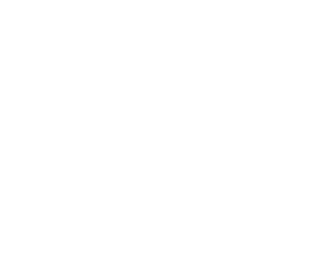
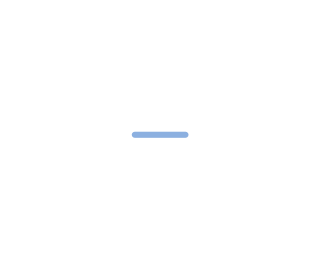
bottom track: none -> (185, 134) (134, 134)

